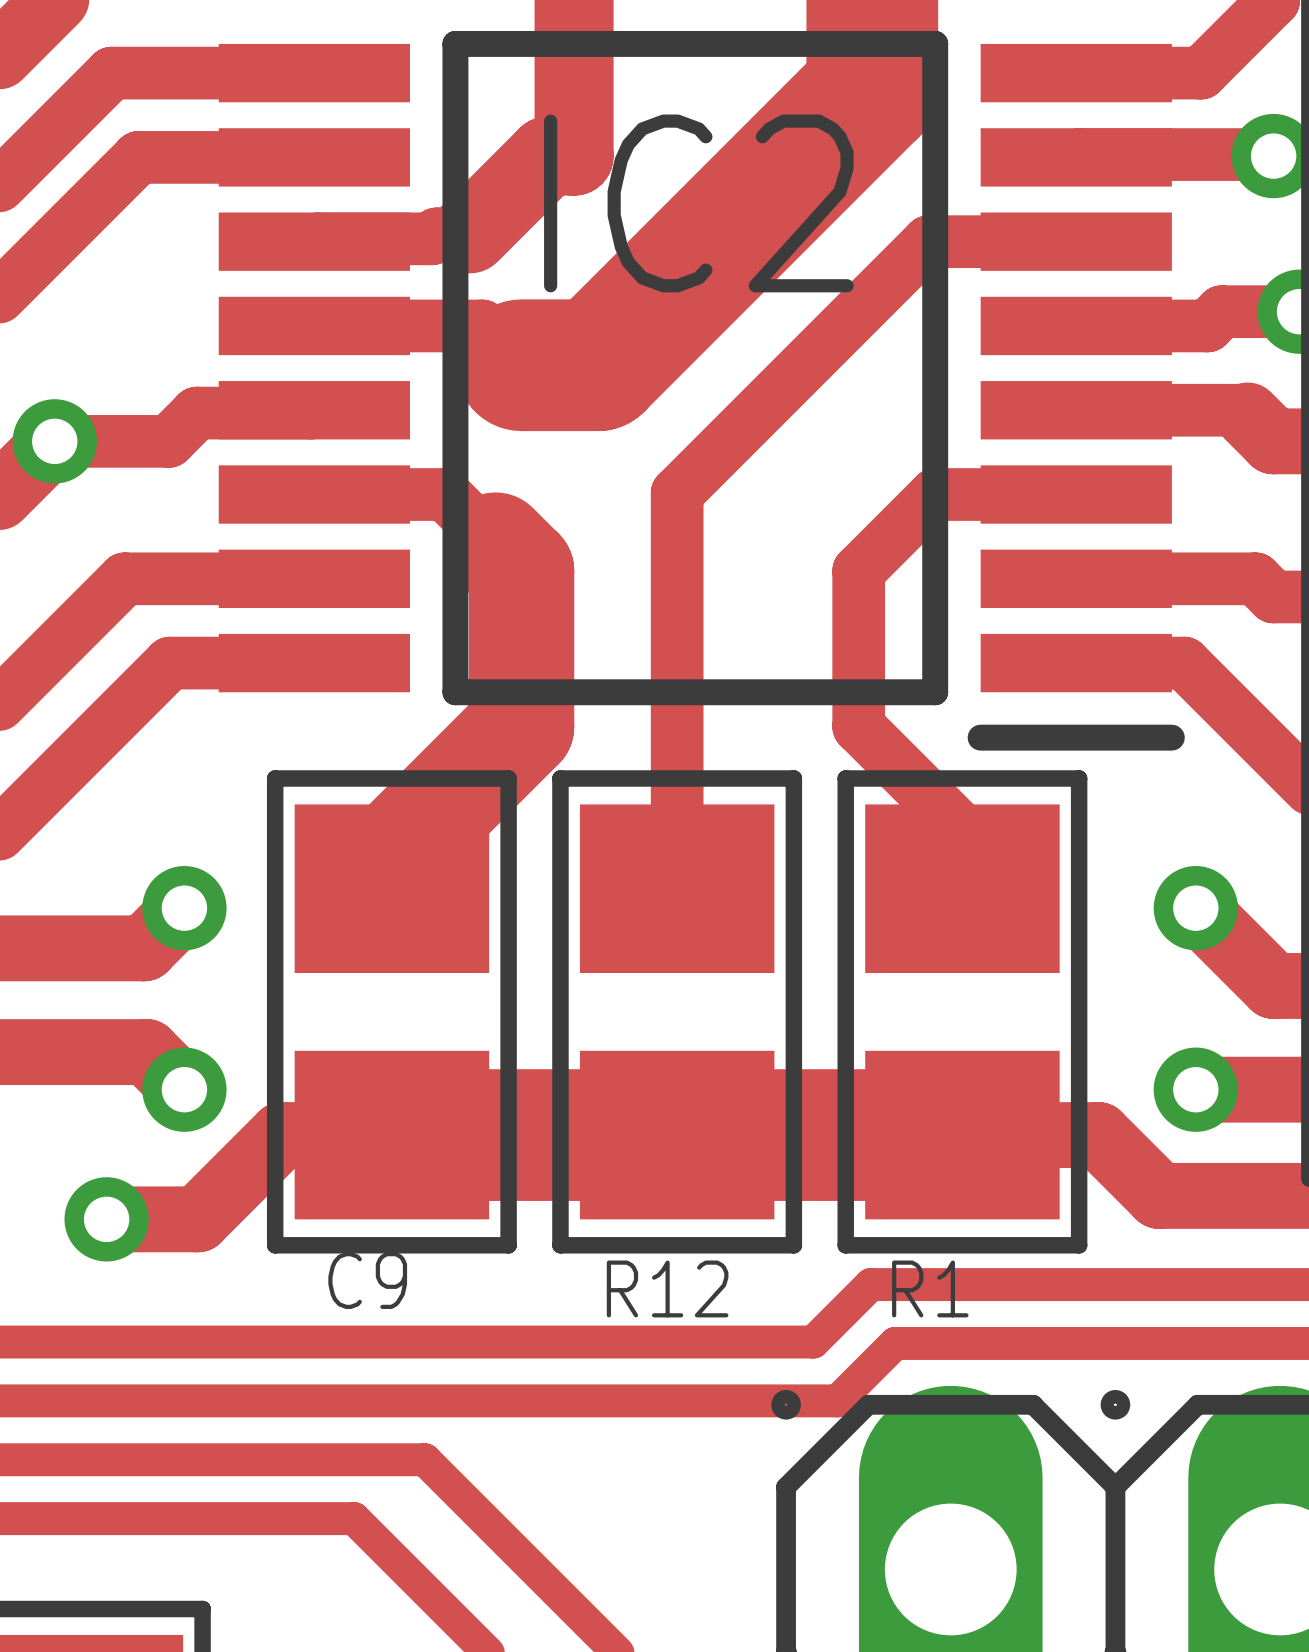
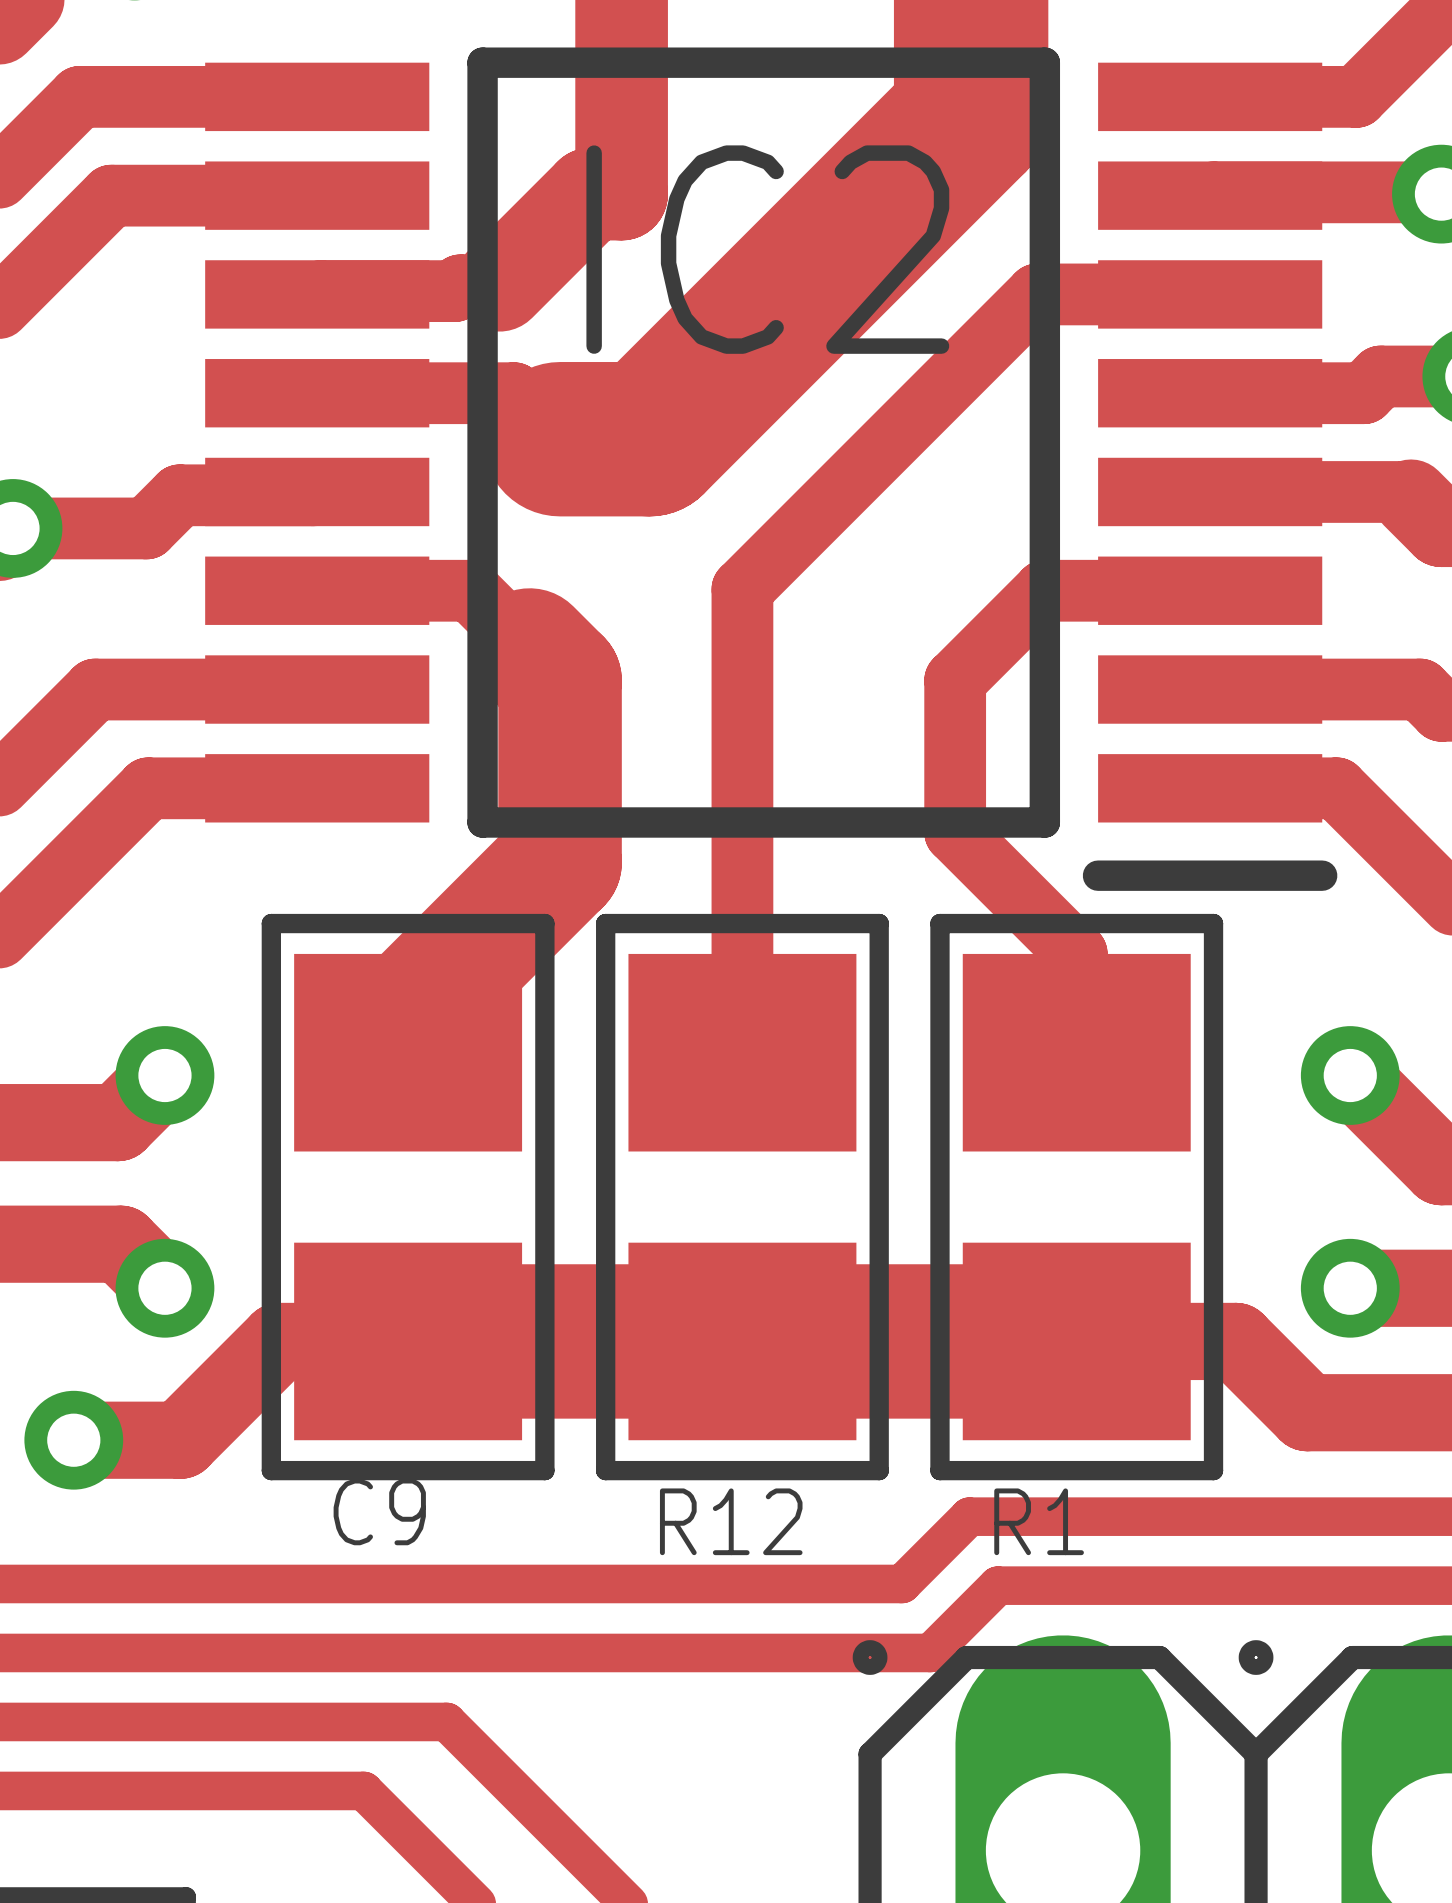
track: (858, 700) (858, 726) (962, 830) -> (955, 832) (1076, 953) (1076, 984)

